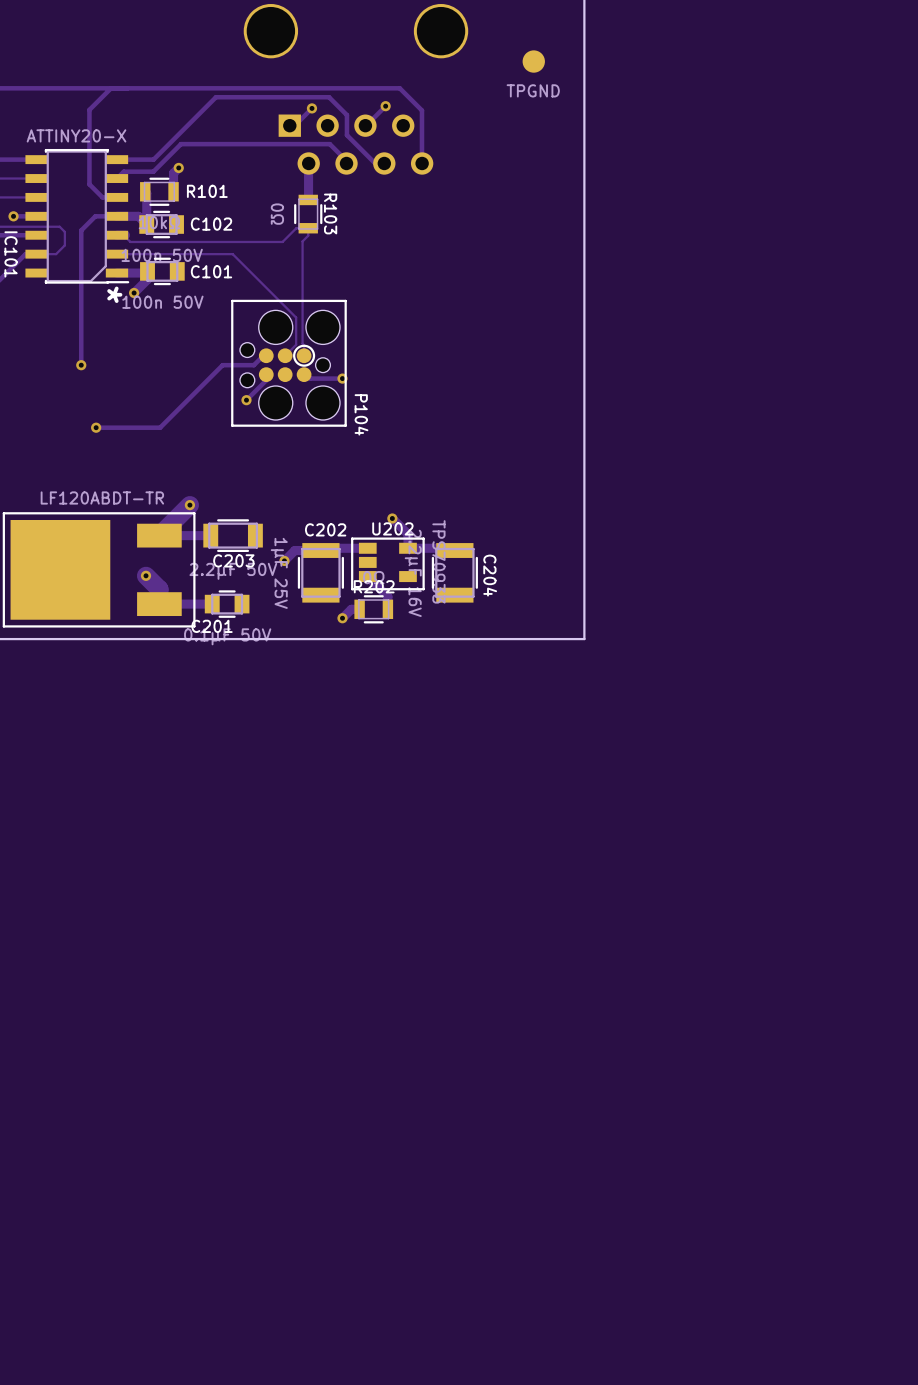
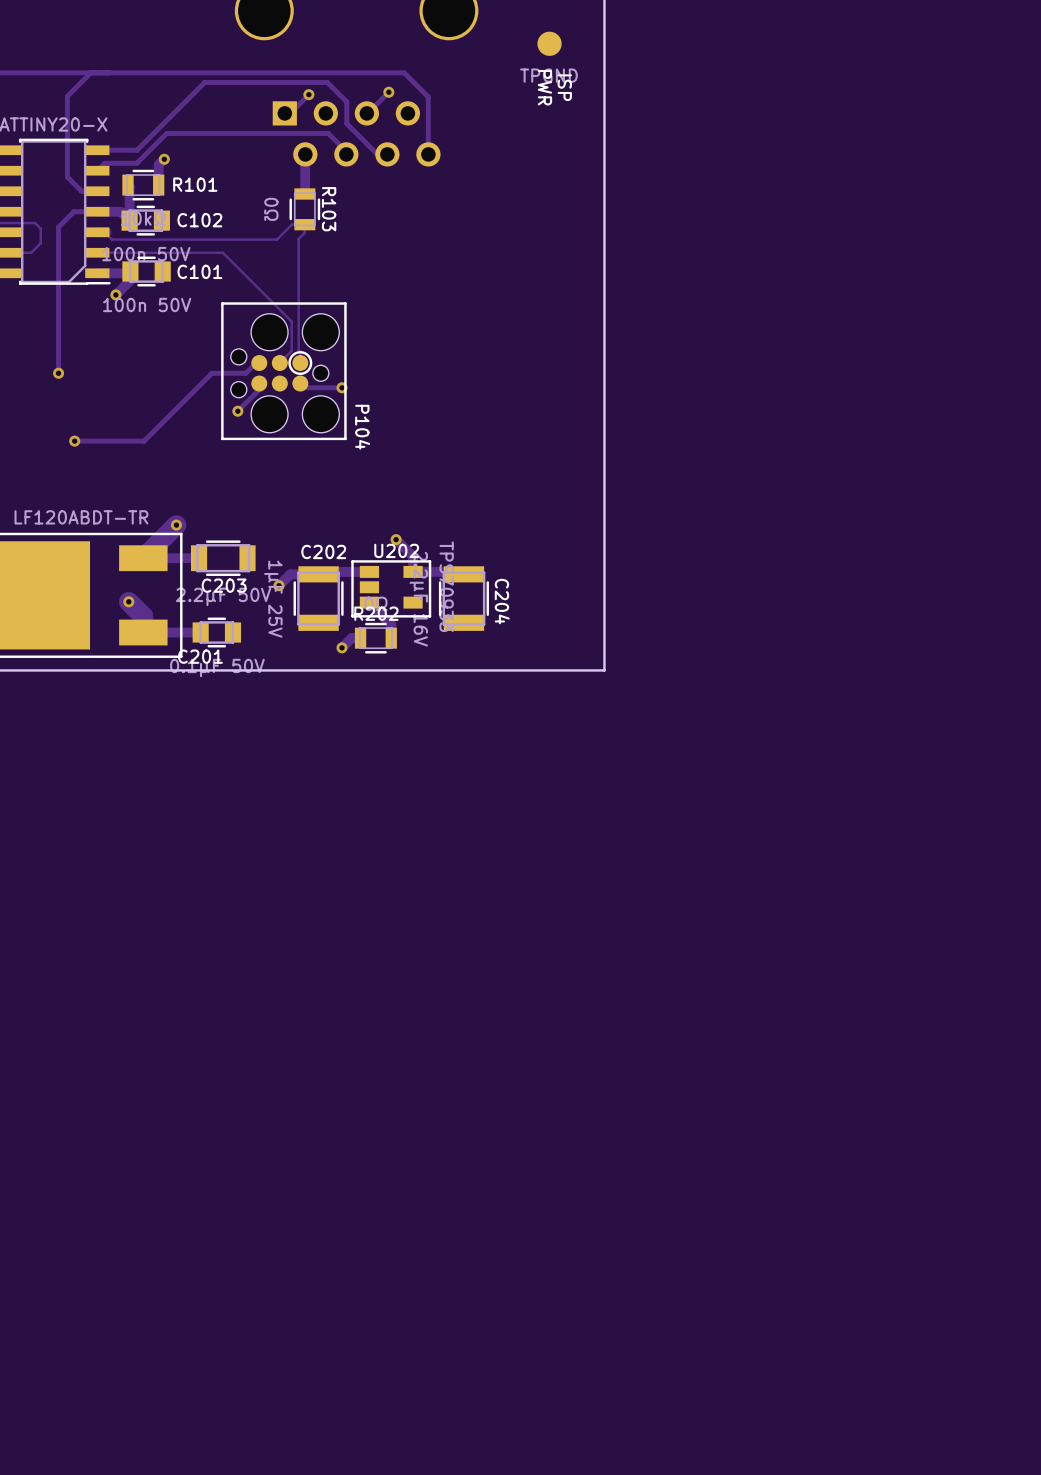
text: none -> PWR (544, 87)
text: none -> ISP (564, 87)
text: * (114, 294) -> none

